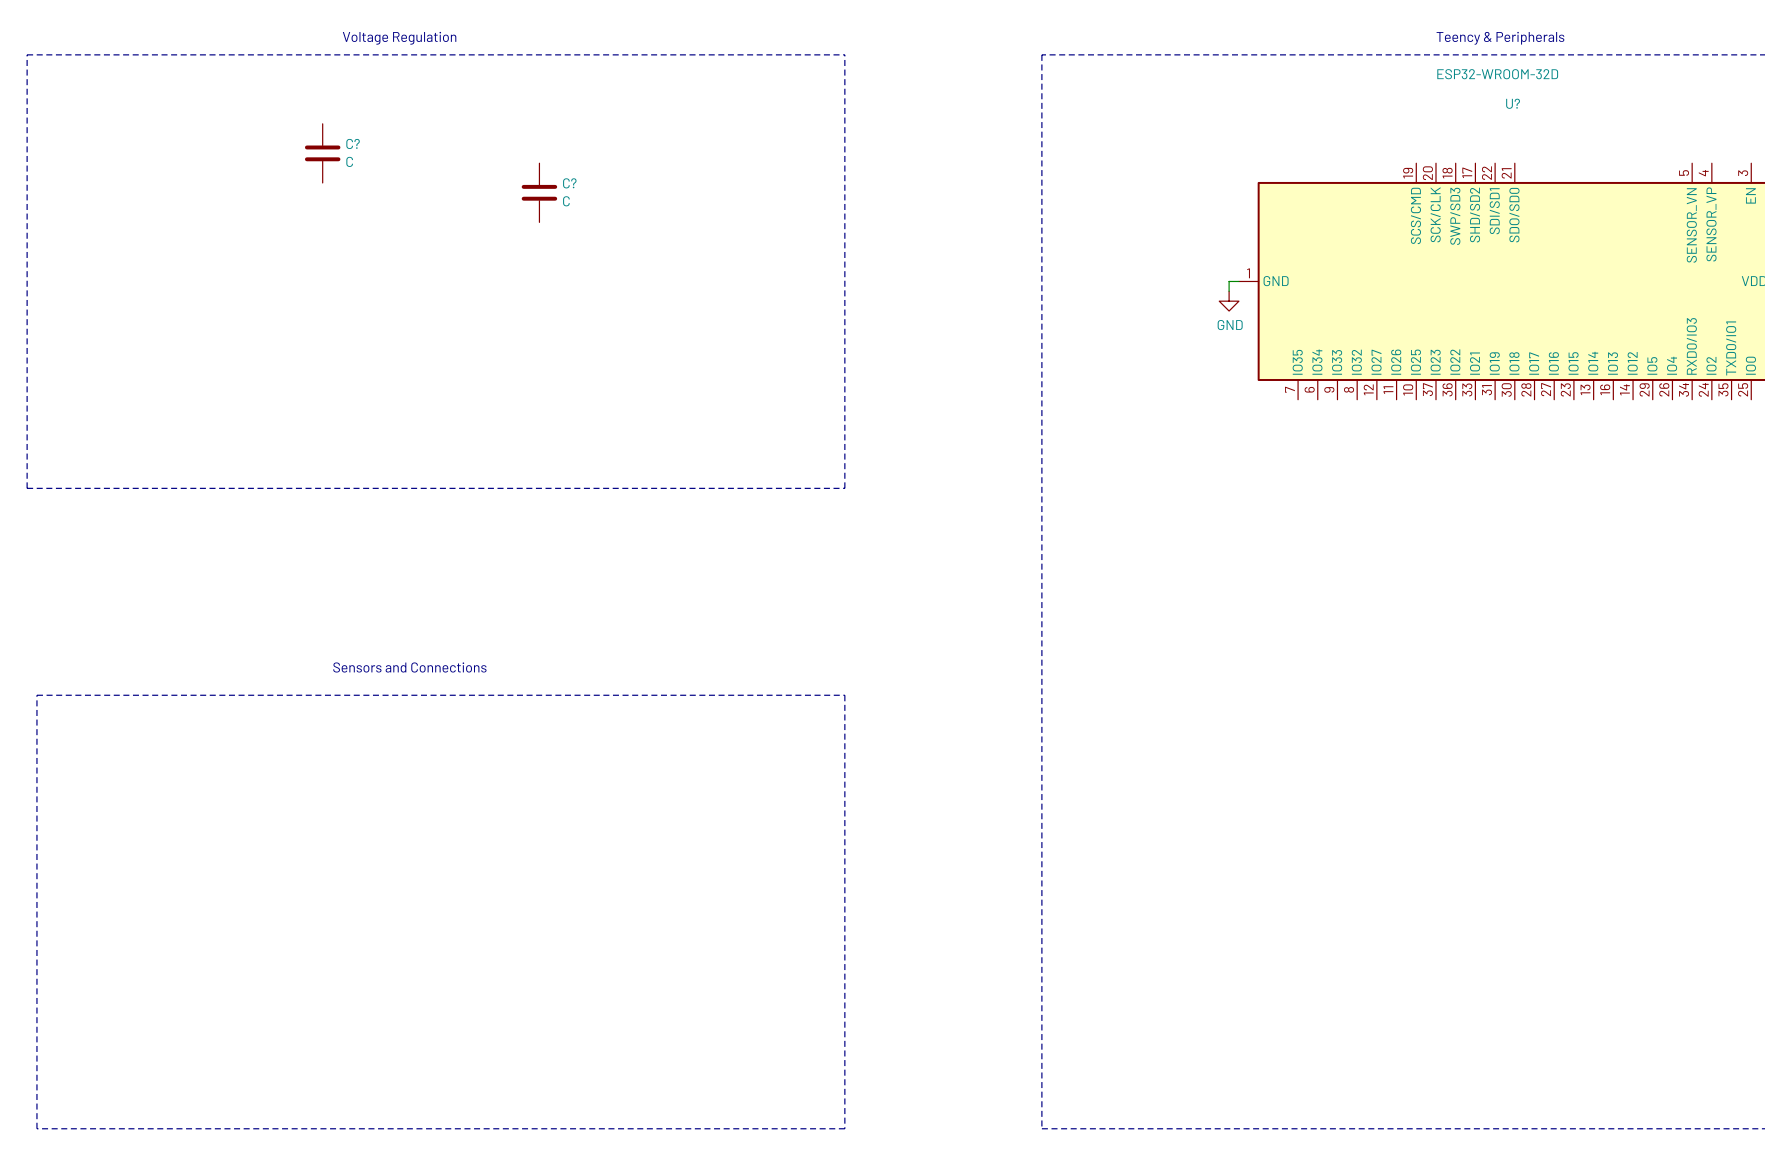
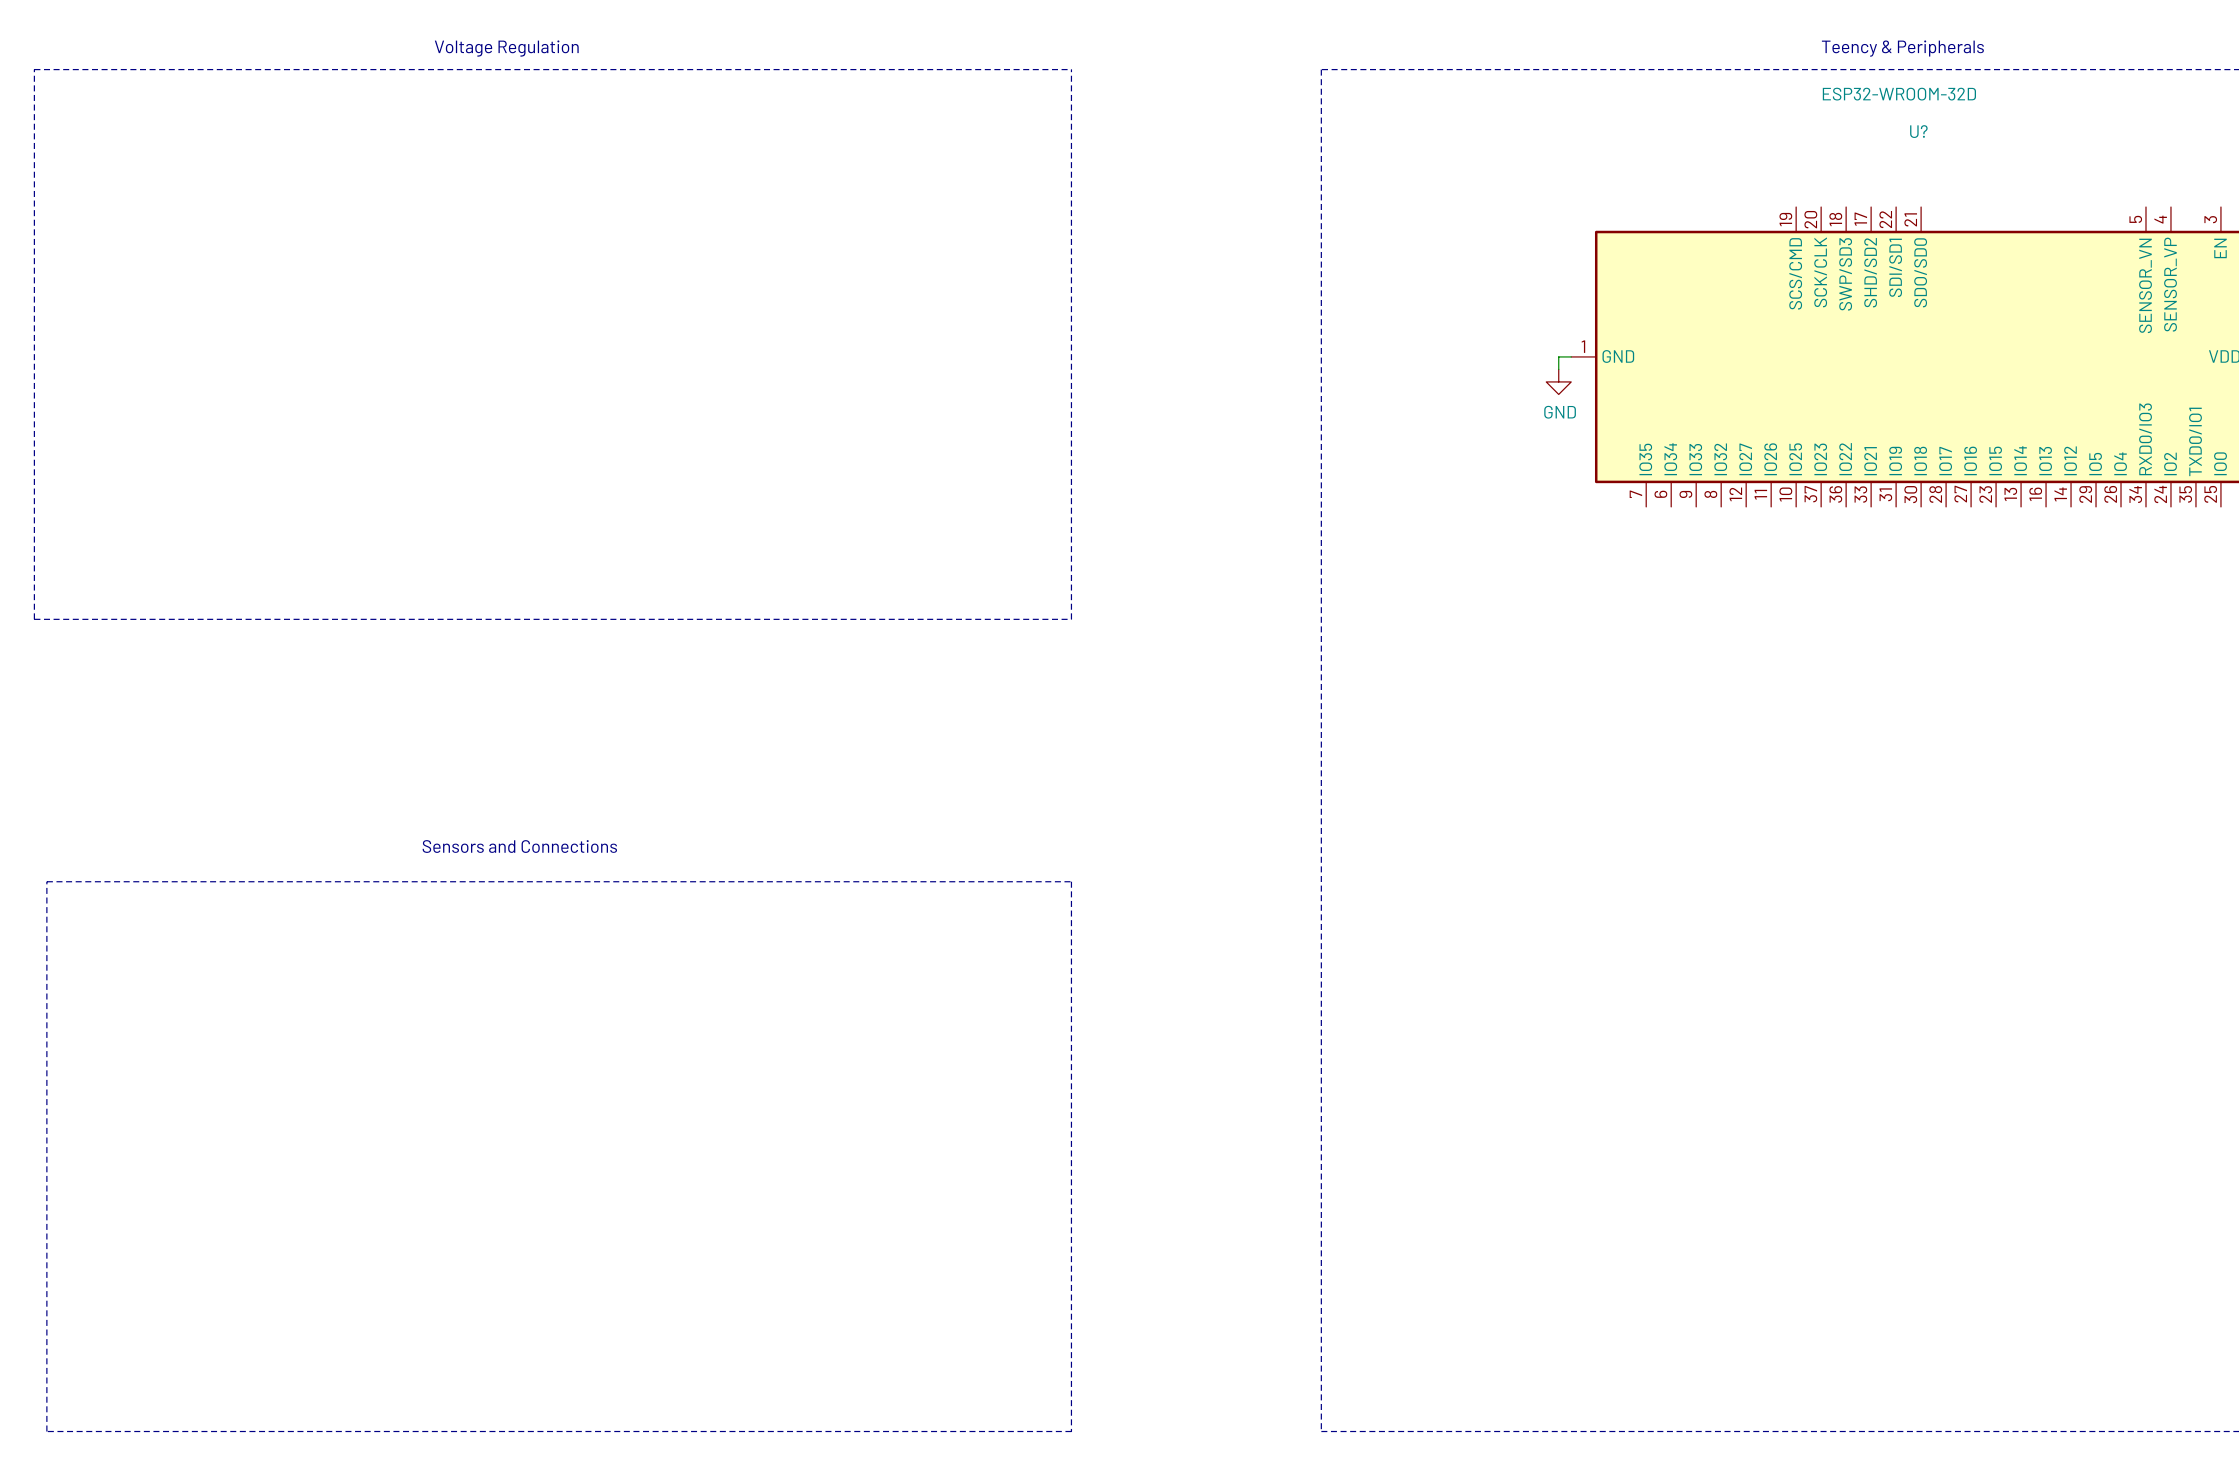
C?: C (322, 153) -> none
C?: C (539, 192) -> none

